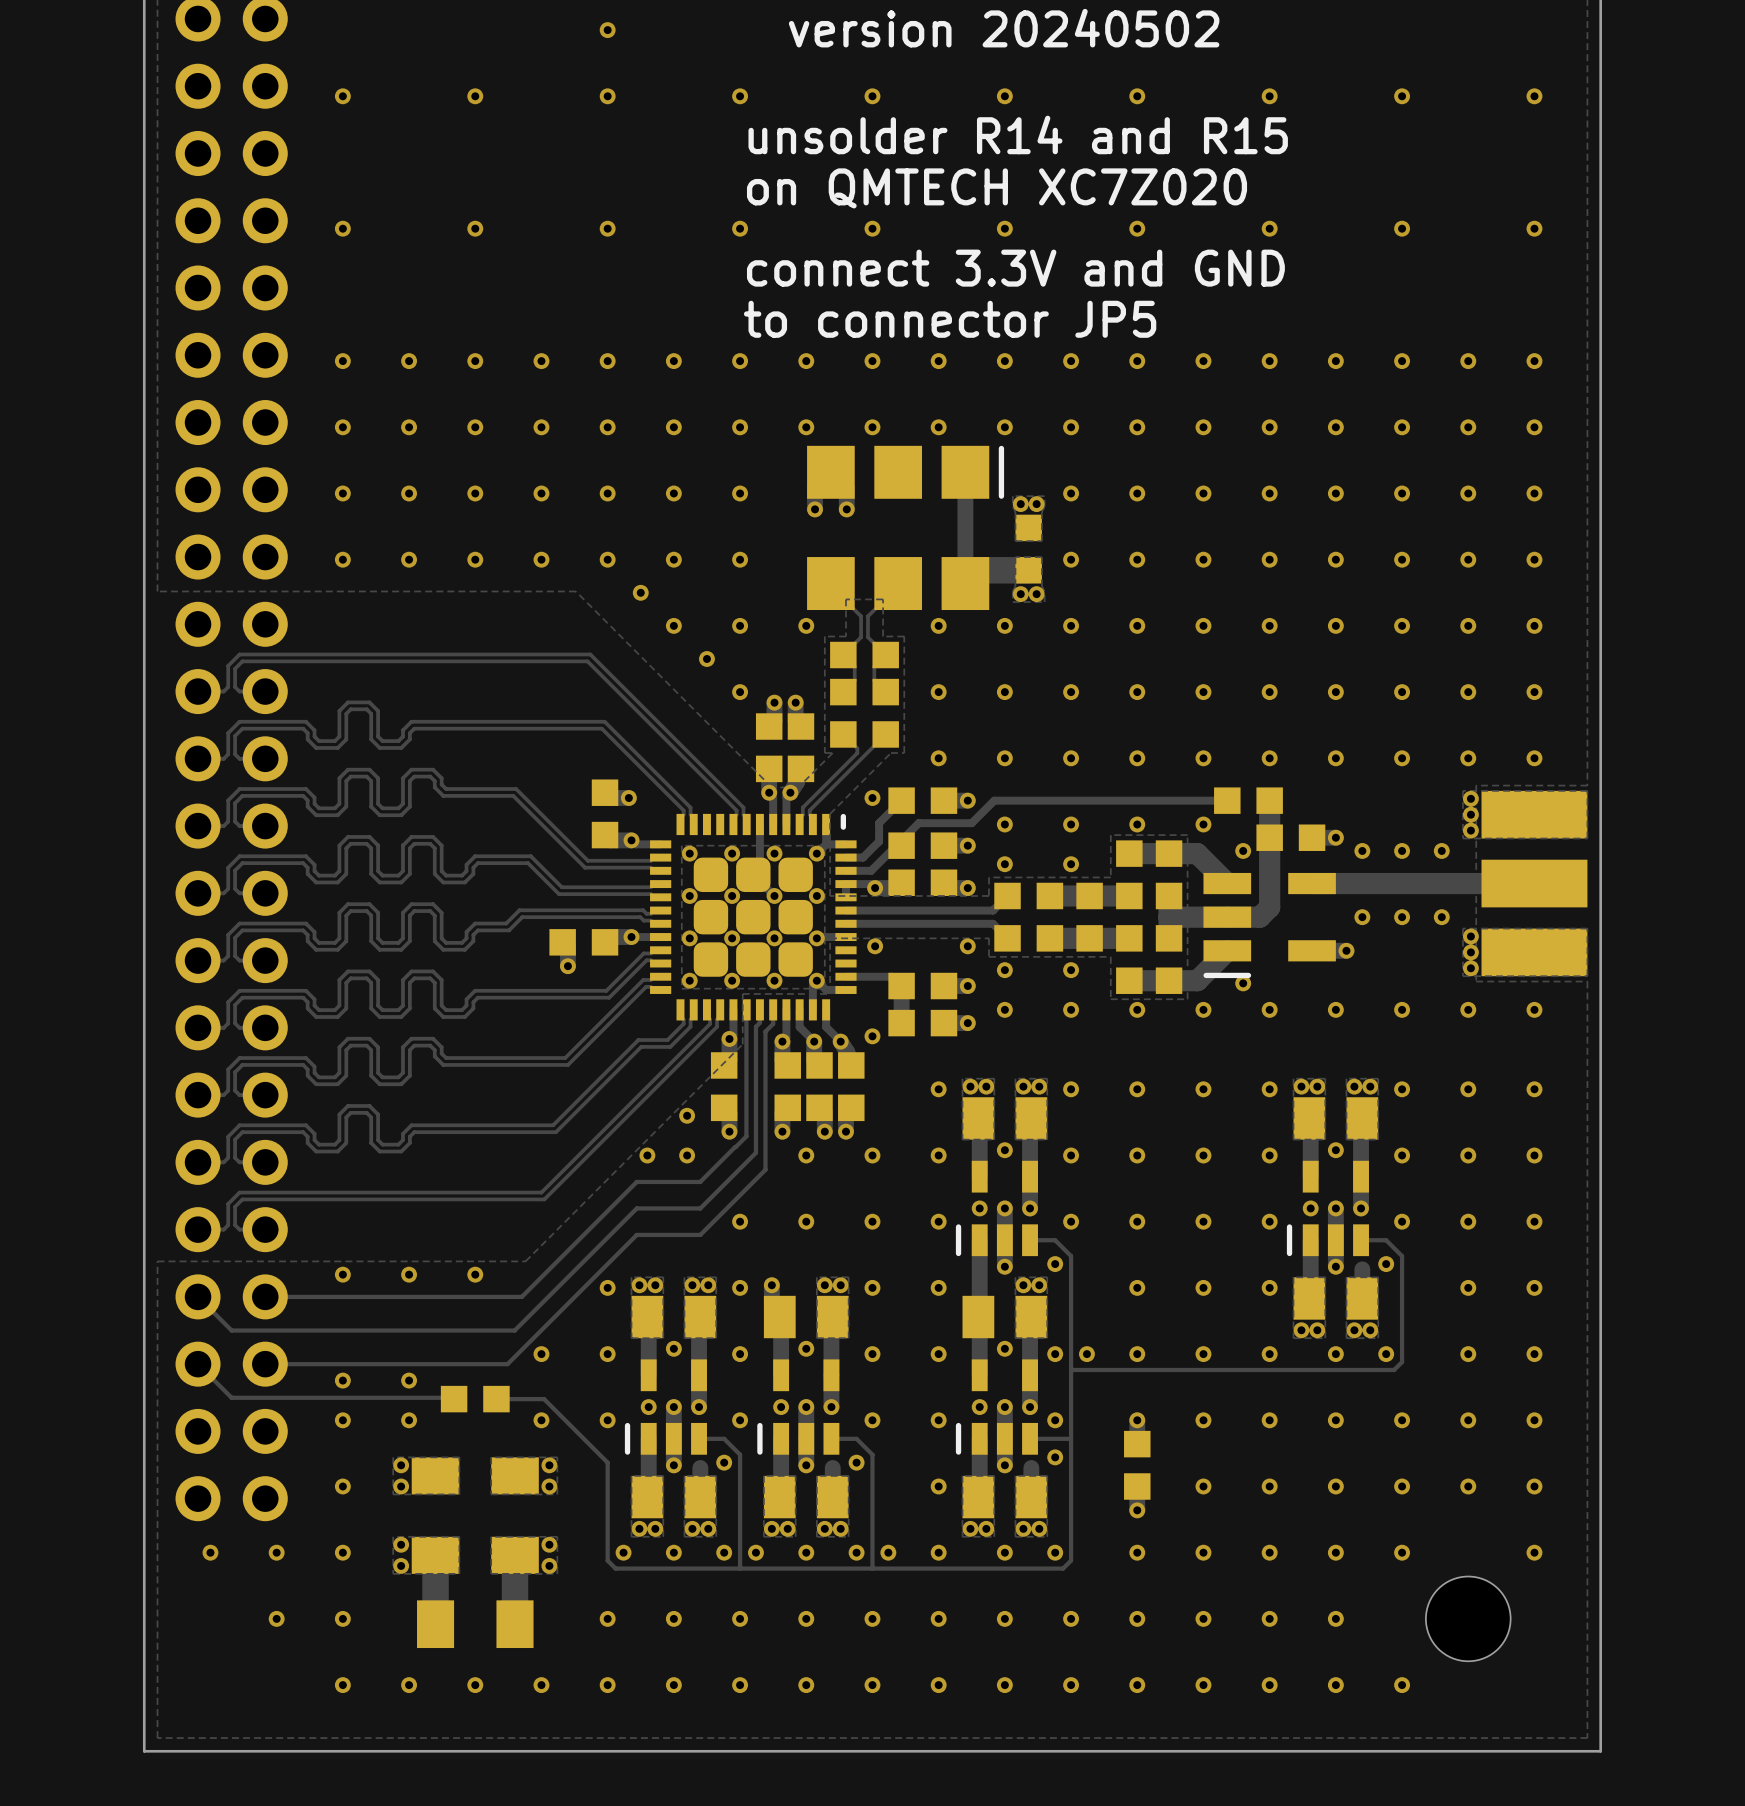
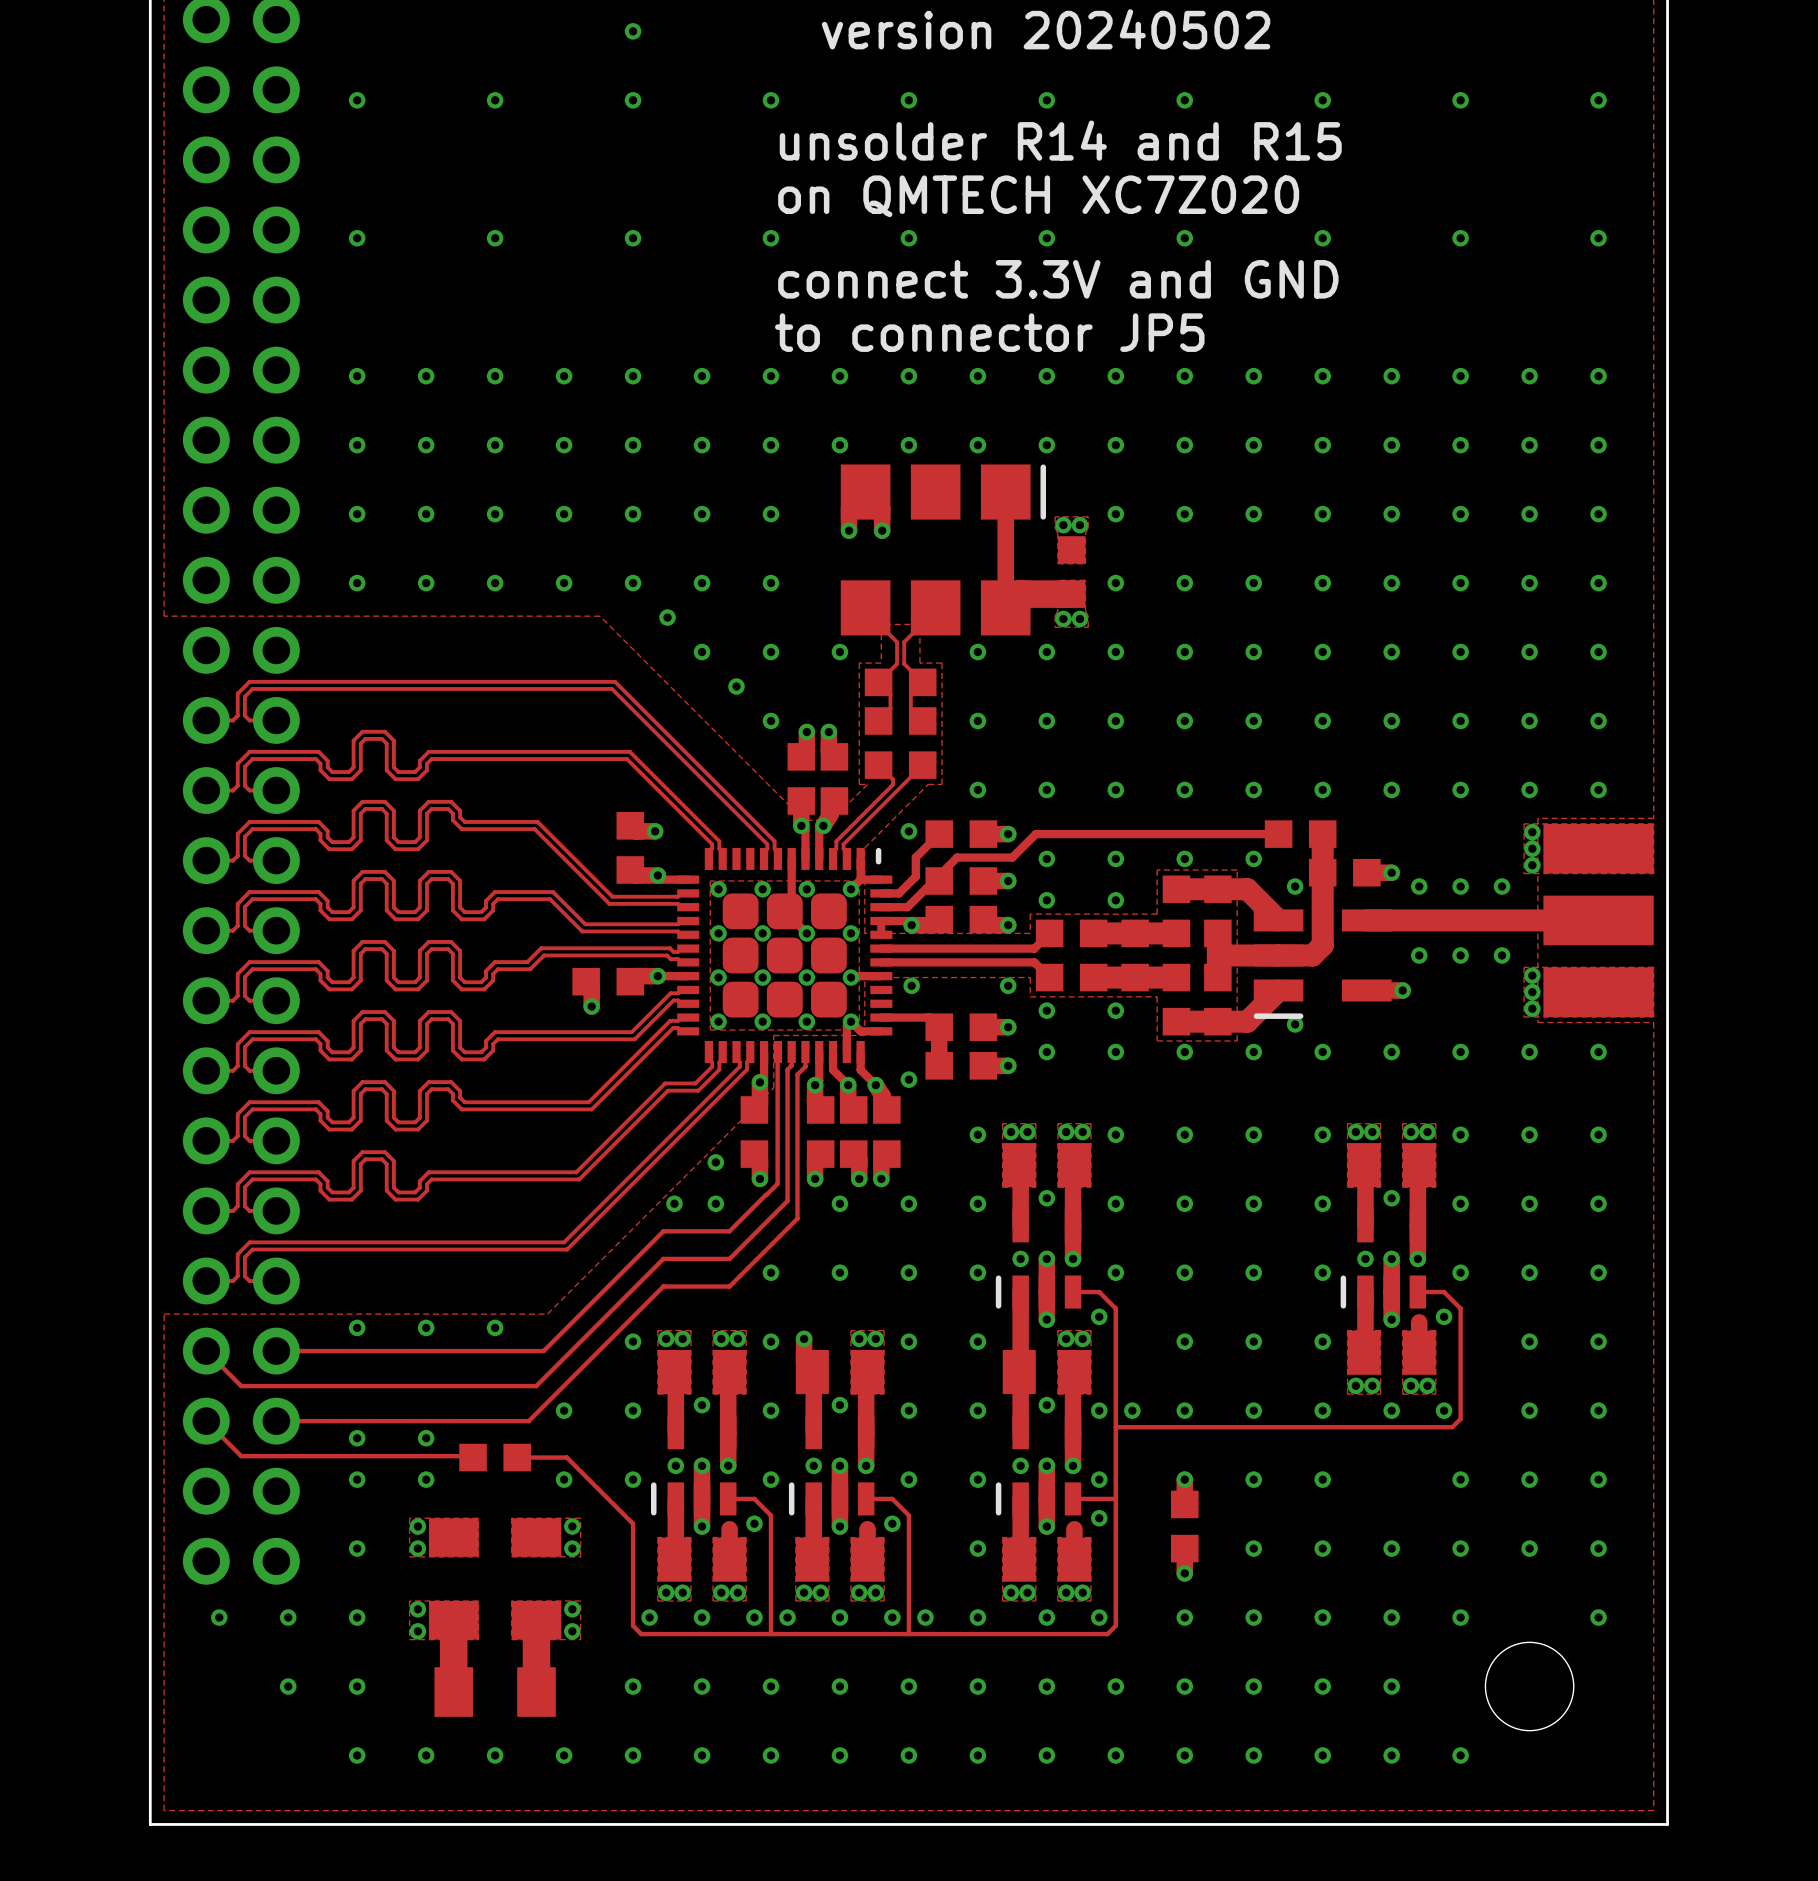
via: (1335, 1420) -> none

